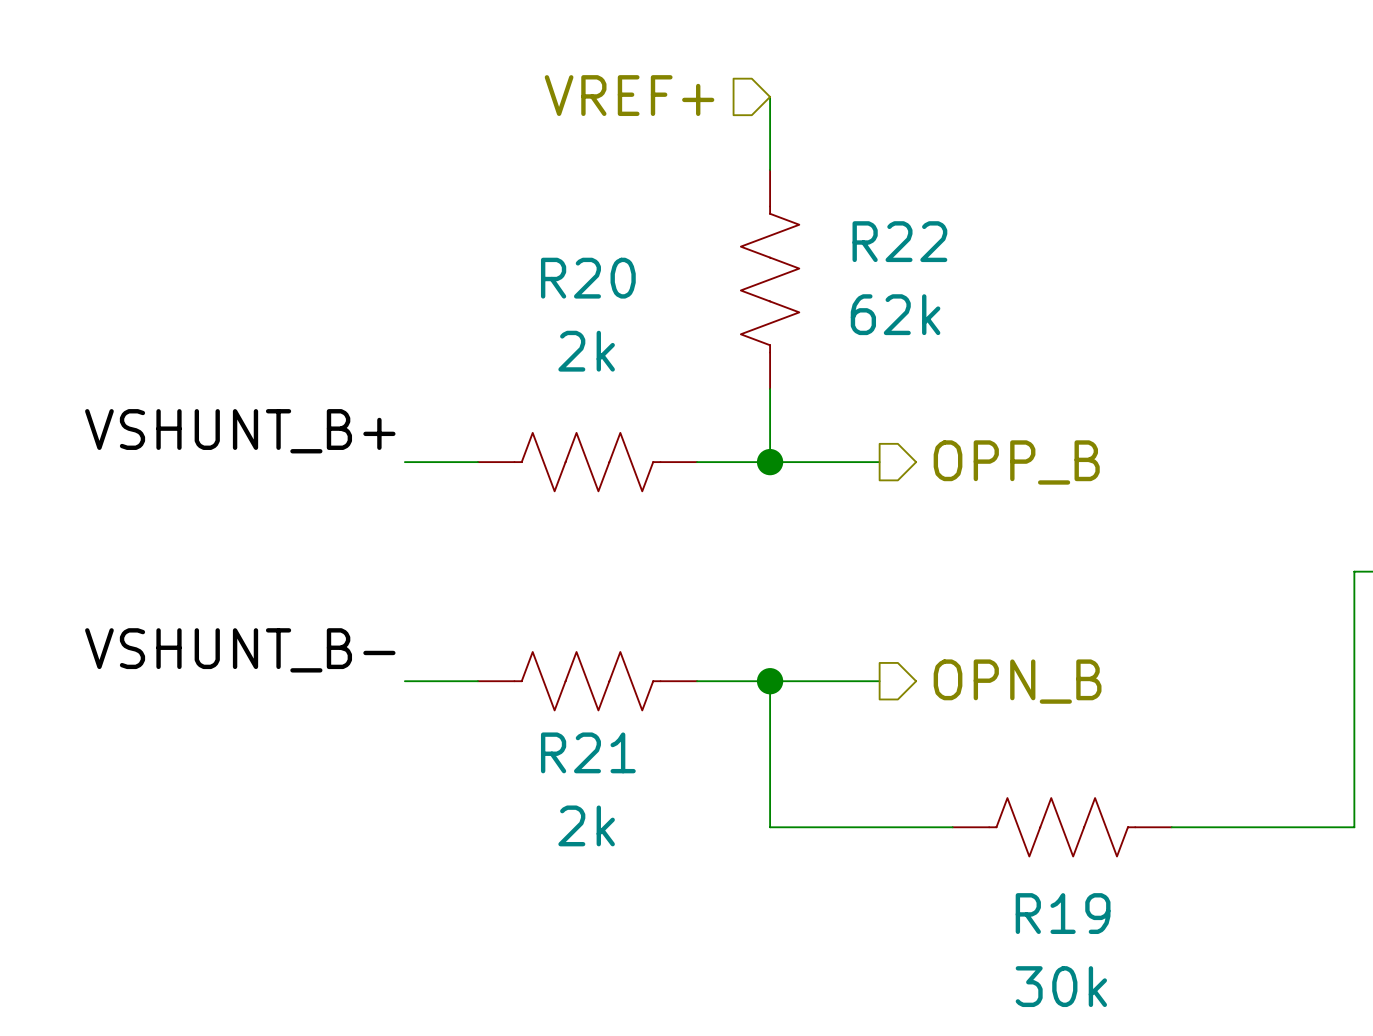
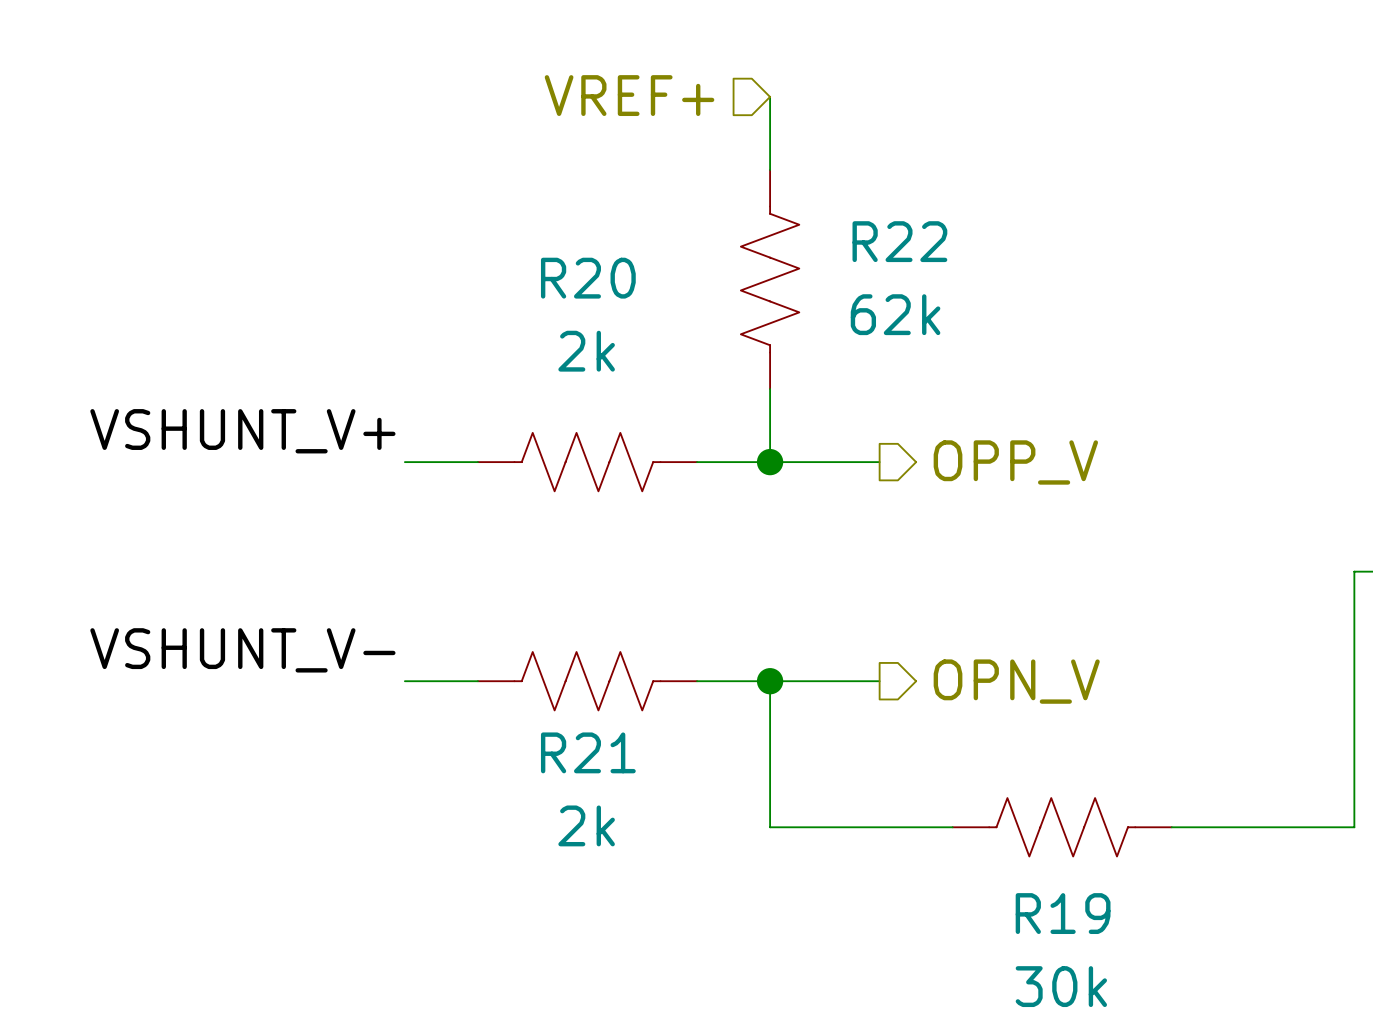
label: VSHUNT_B+ (240, 431) -> VSHUNT_V+ (242, 431)
hierarchical label: OPP_B (1016, 462) -> OPP_V (1015, 462)
label: VSHUNT_B- (240, 650) -> VSHUNT_V- (242, 650)
hierarchical label: OPN_B (1017, 681) -> OPN_V (1016, 681)

